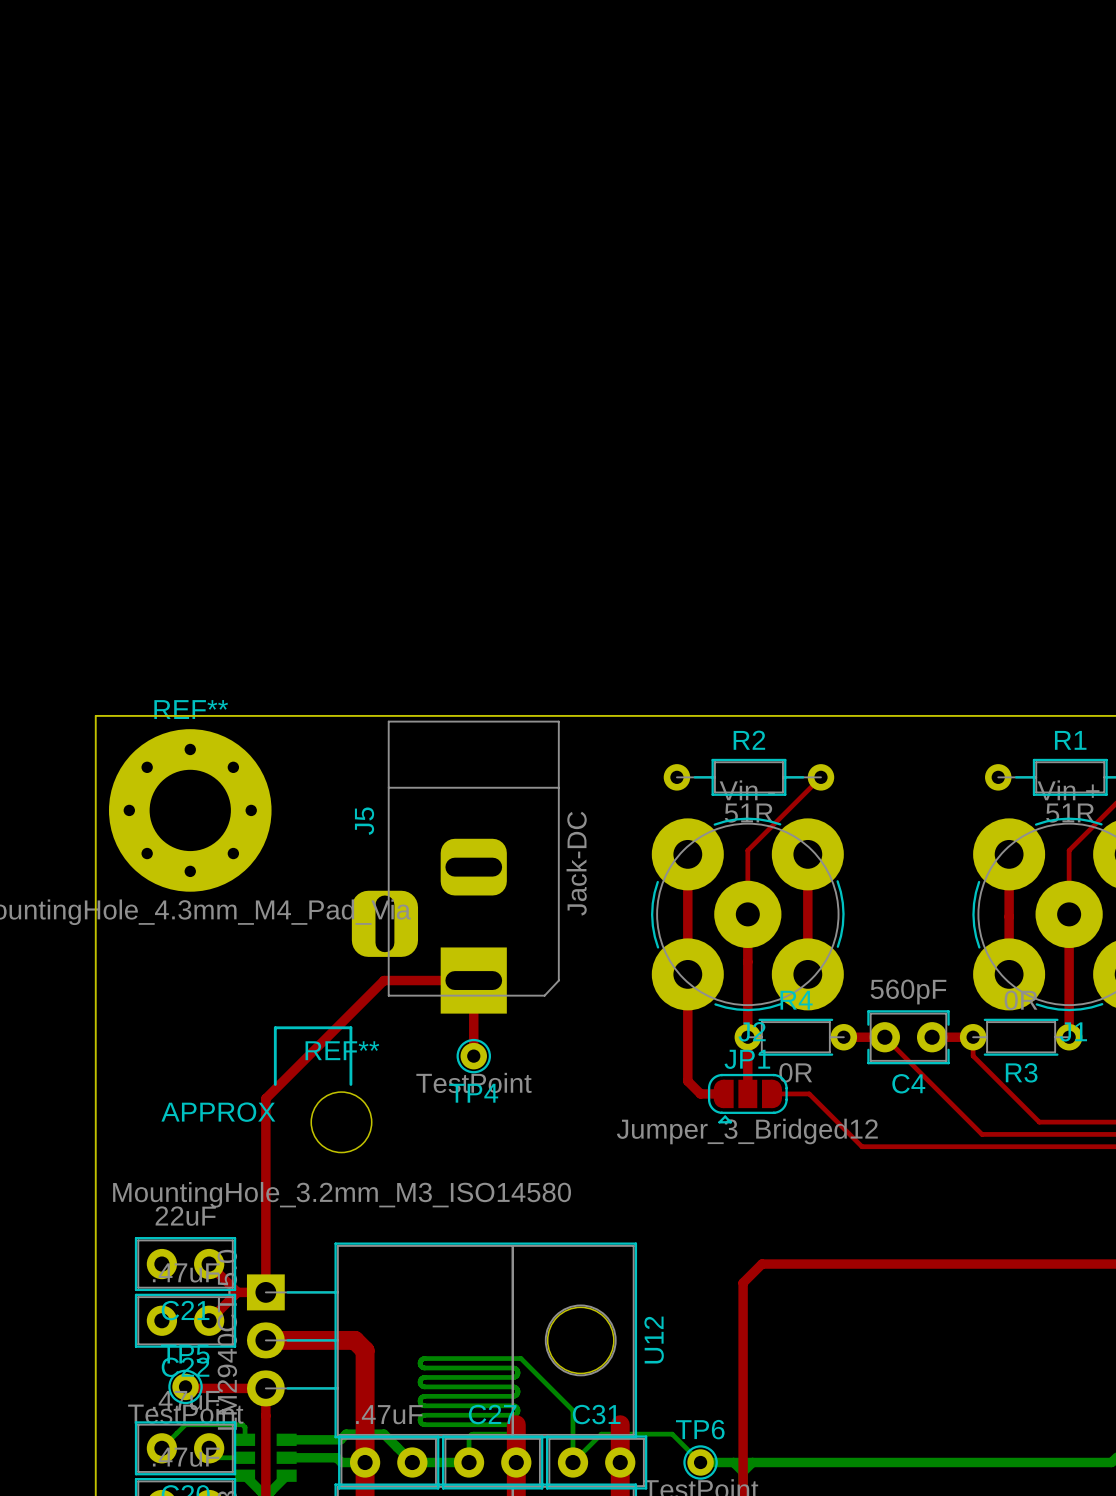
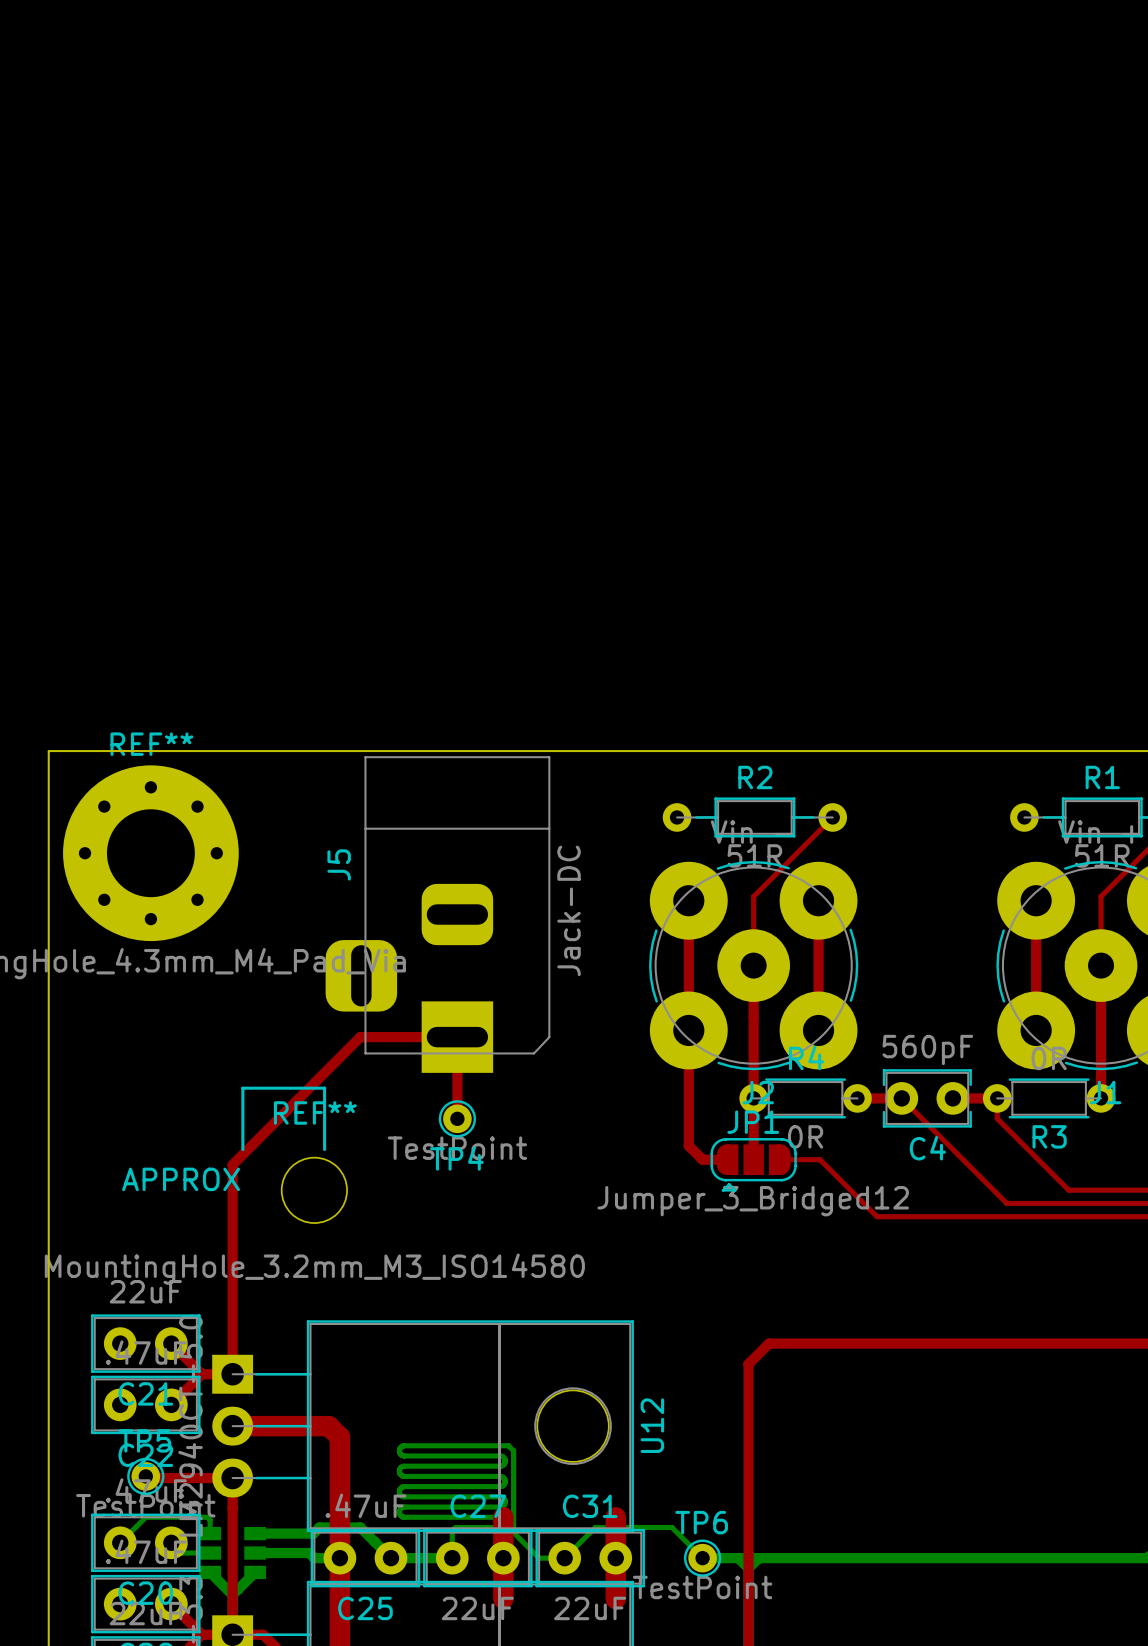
bottom track: (525, 1363) (573, 1410) (573, 1462) -> (513, 1450) (513, 1532) (539, 1558) (564, 1558)

